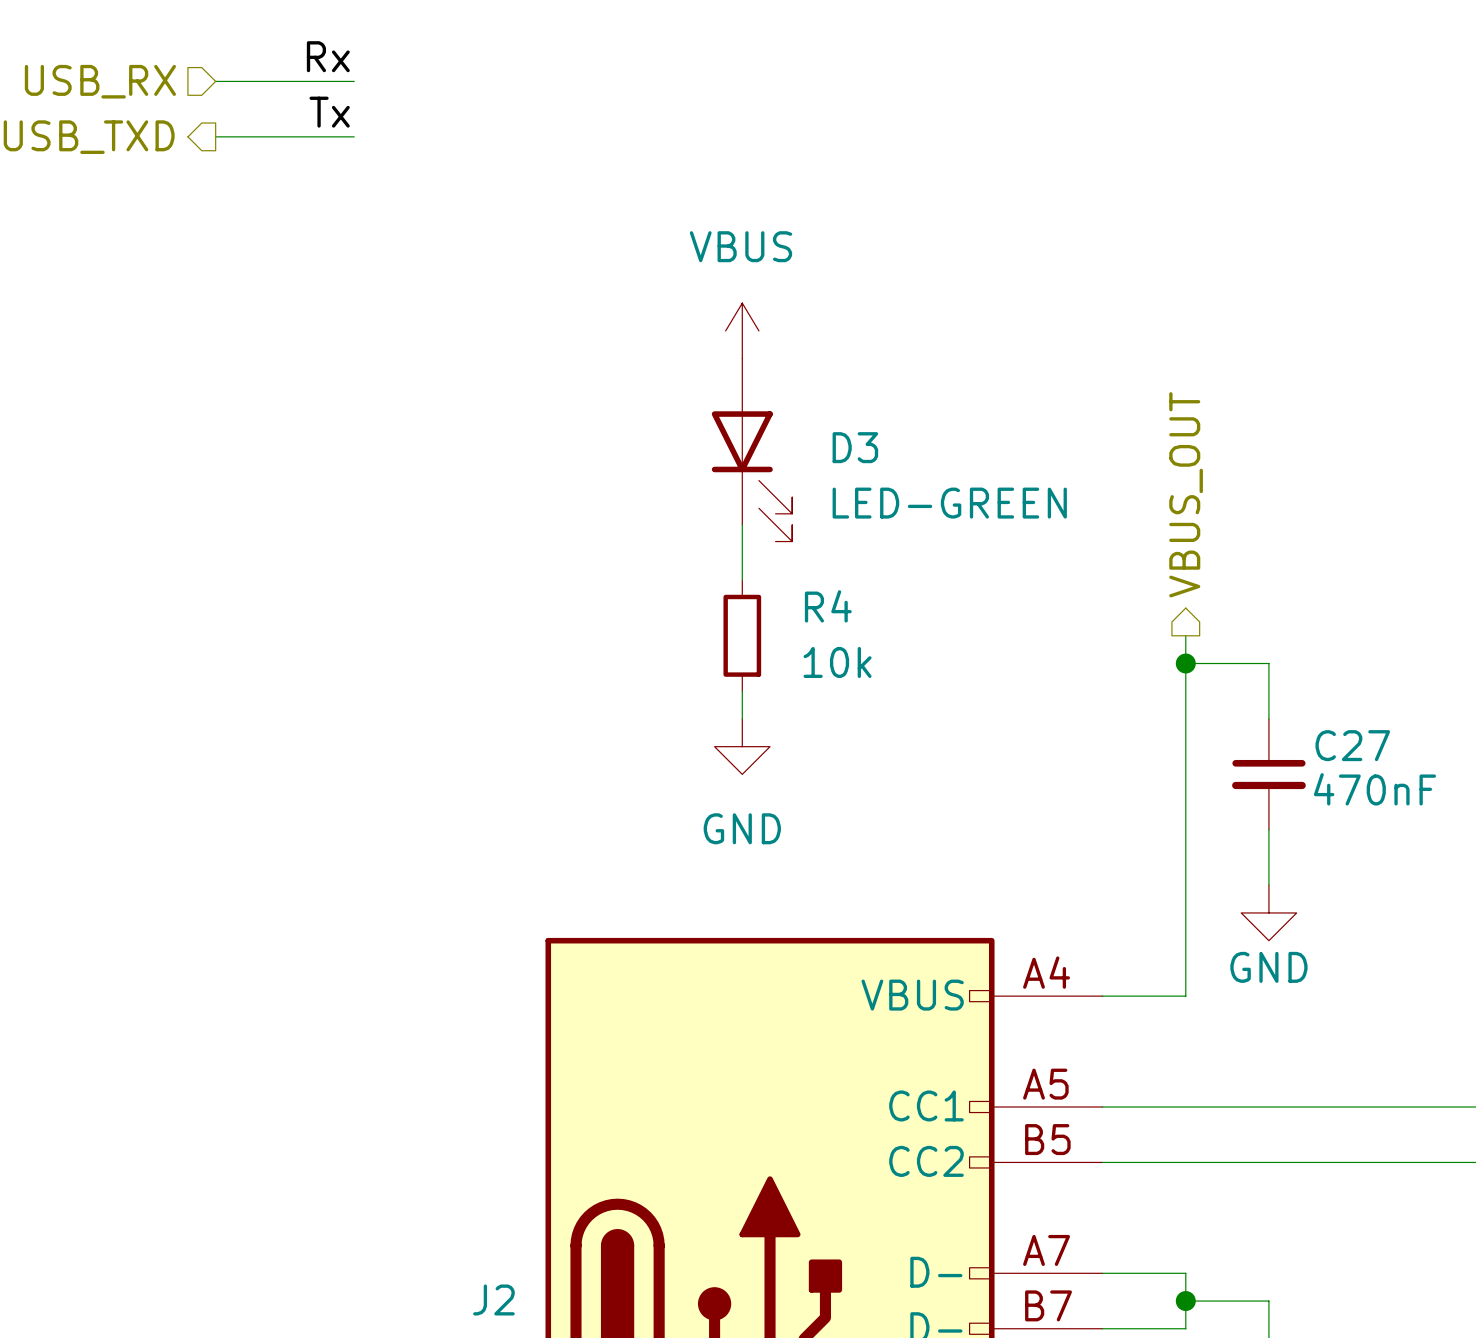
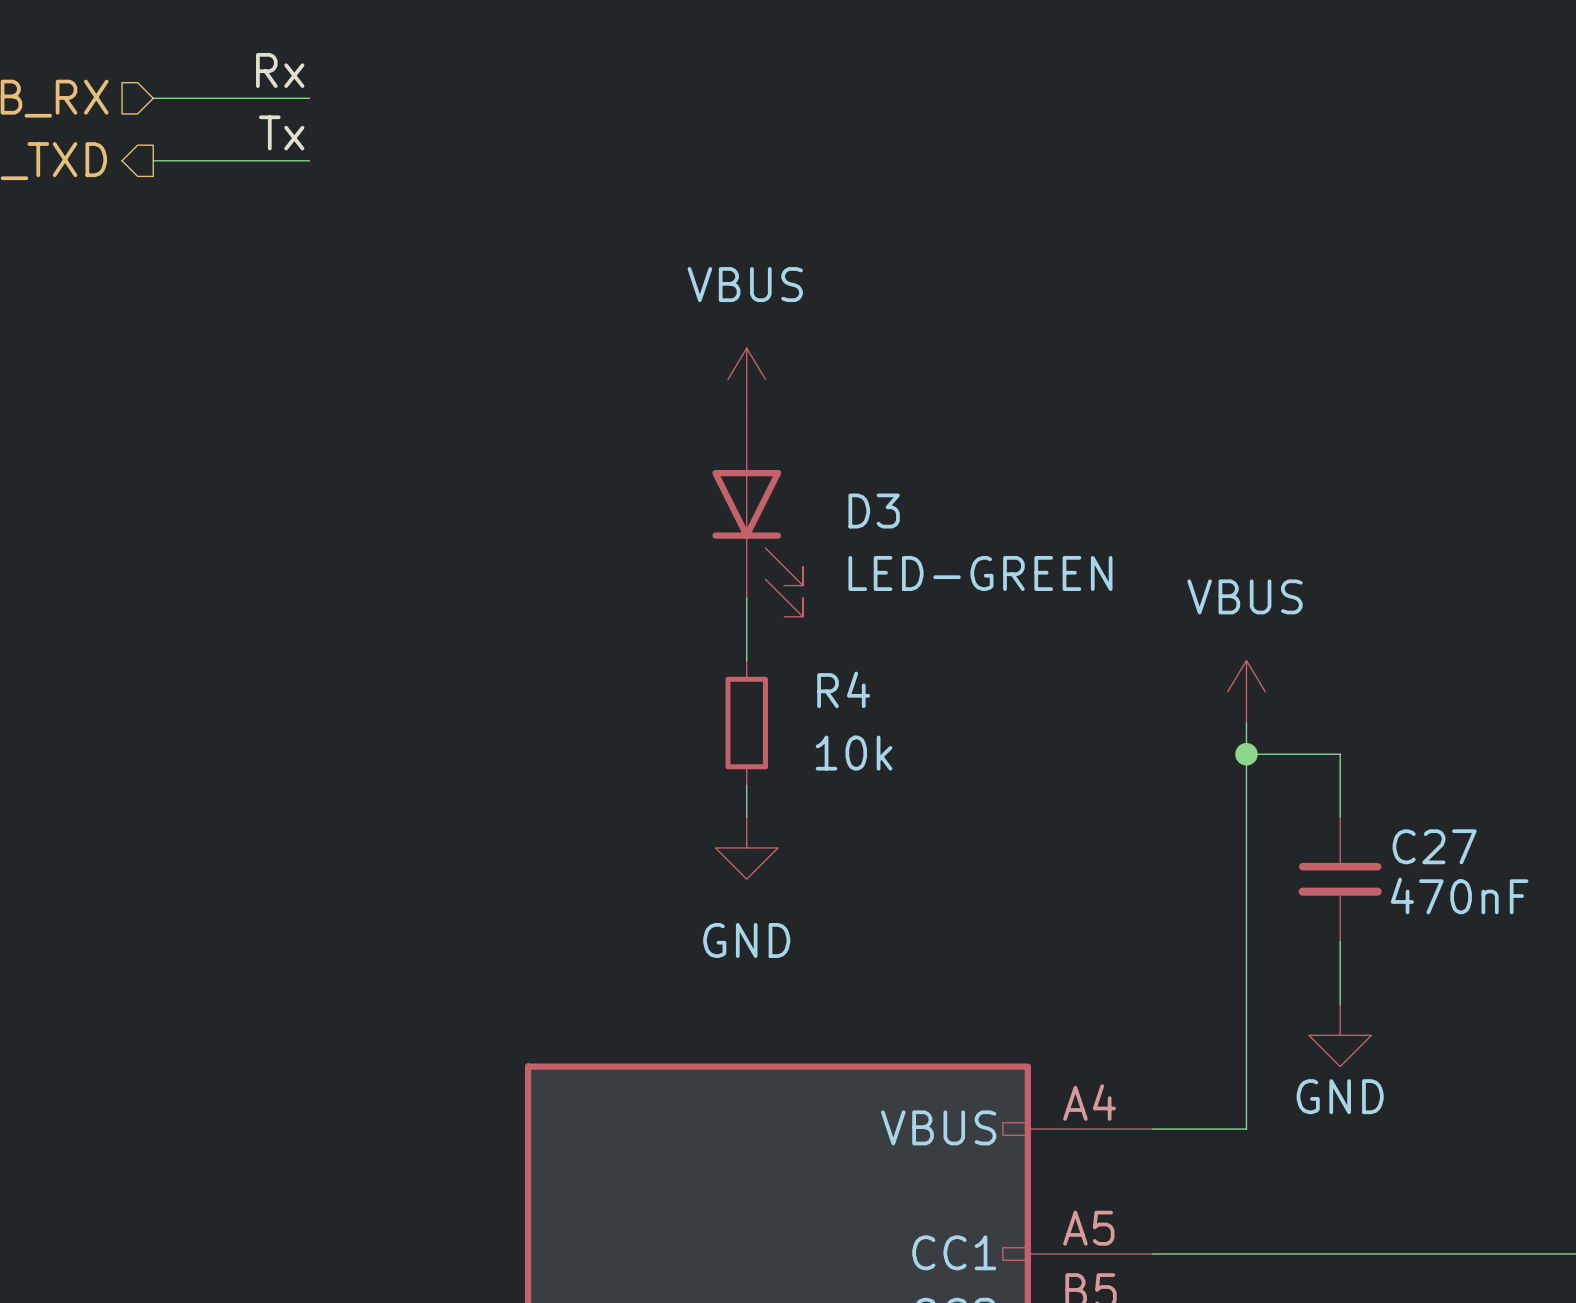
hierarchical label: VBUS_OUT (1186, 494) -> none
power symbol: none -> VBUS (1246, 691)

